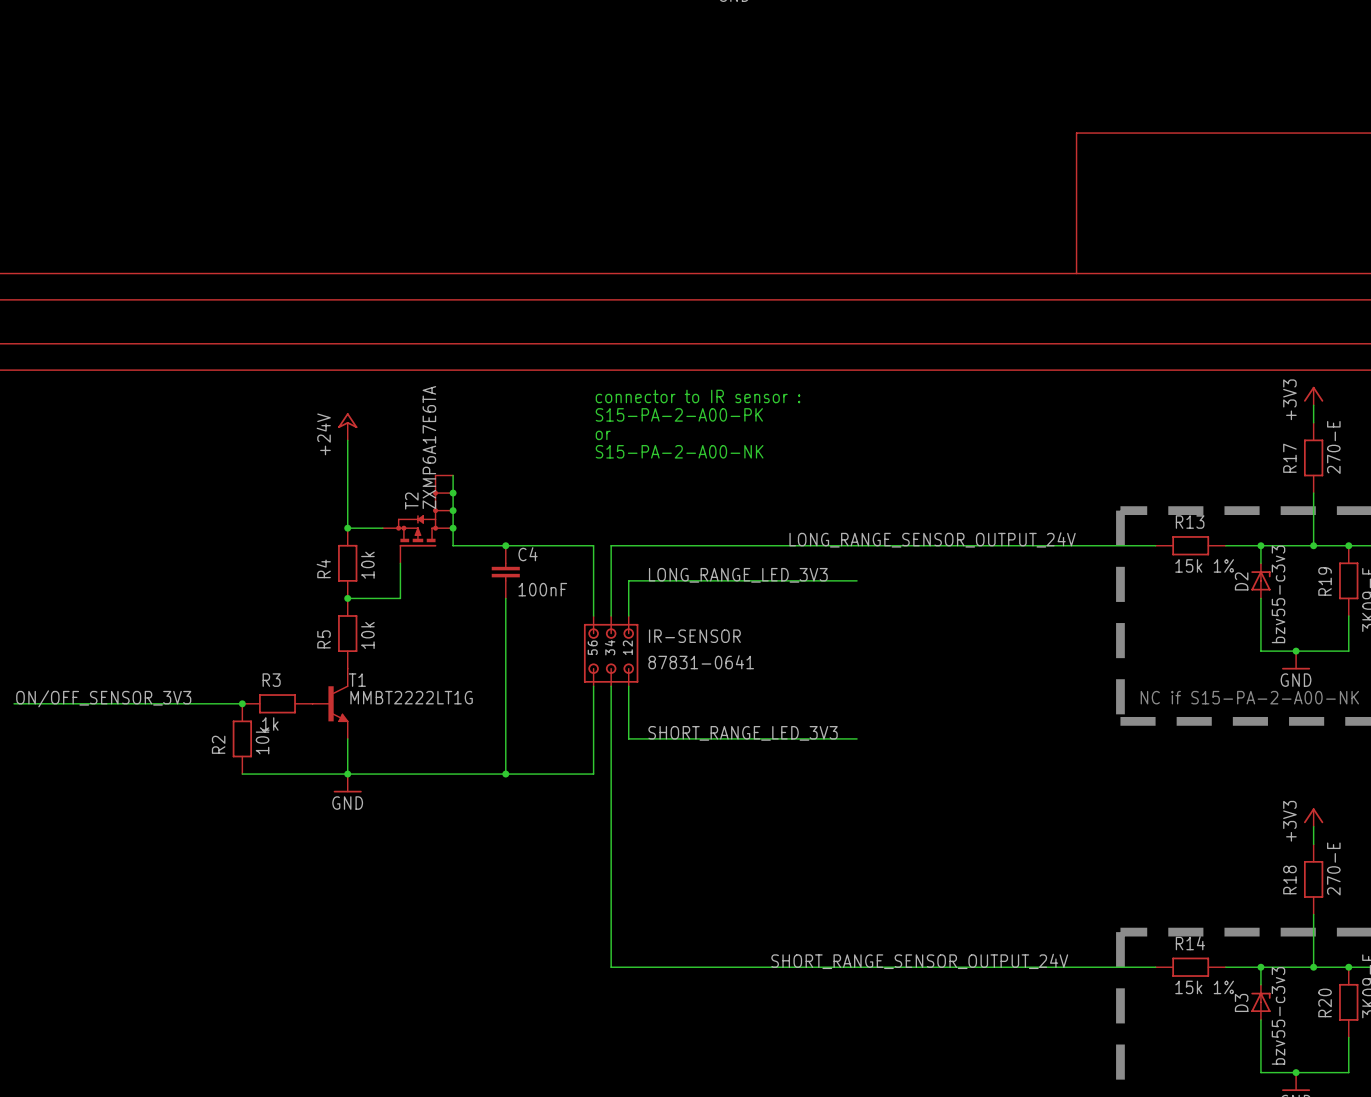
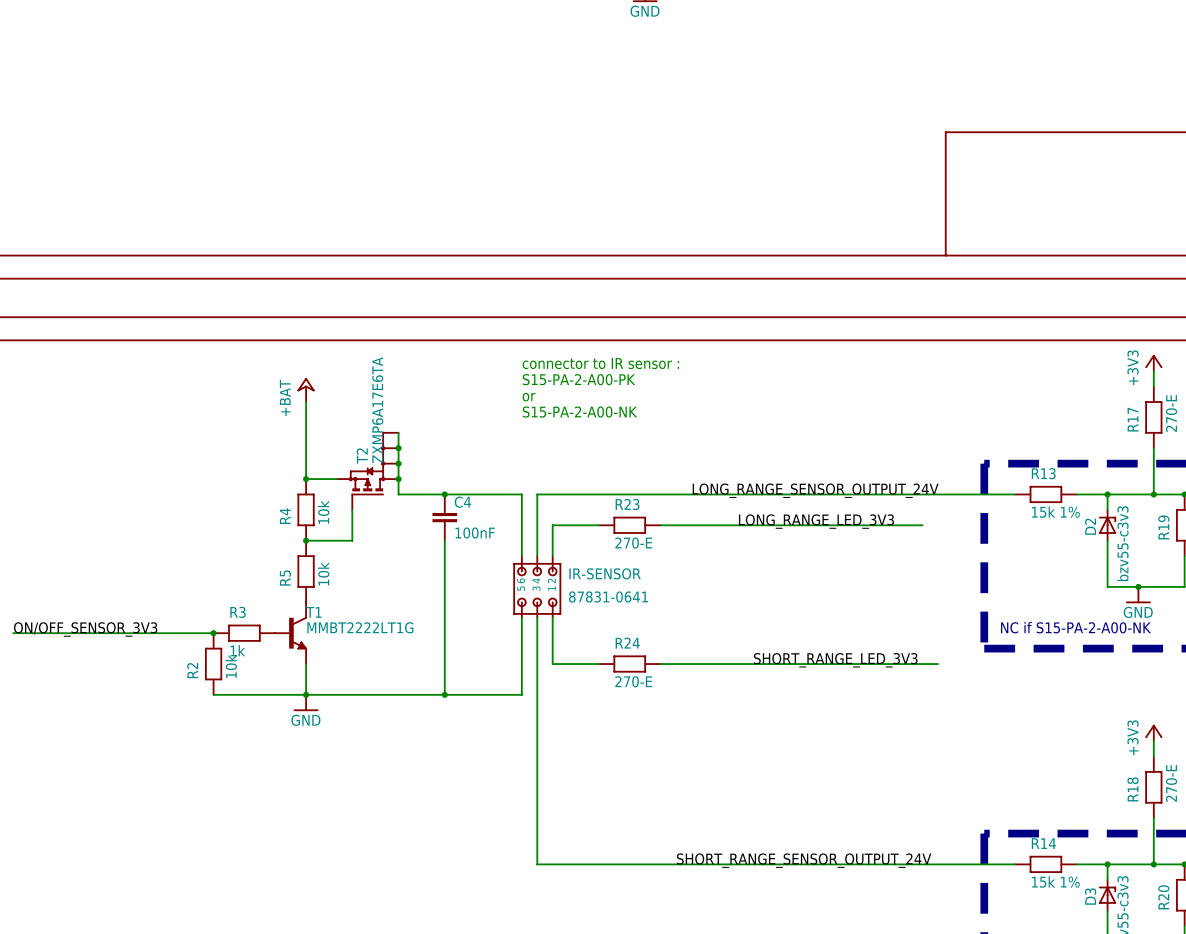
power symbol: +24V (347, 426) -> +BAT (306, 390)
label: LONG_RANGE_LED_3V3 (738, 575) -> none
label: none -> LONG_RANGE_LED_3V3 (816, 521)
R23: none -> 270-E (629, 525)
wire: none -> (753, 525) (922, 525)
label: SHORT_RANGE_LED_3V3 (743, 733) -> none
label: none -> SHORT_RANGE_LED_3V3 (835, 660)
R24: none -> 270-E (629, 664)
wire: none -> (753, 664) (938, 664)

